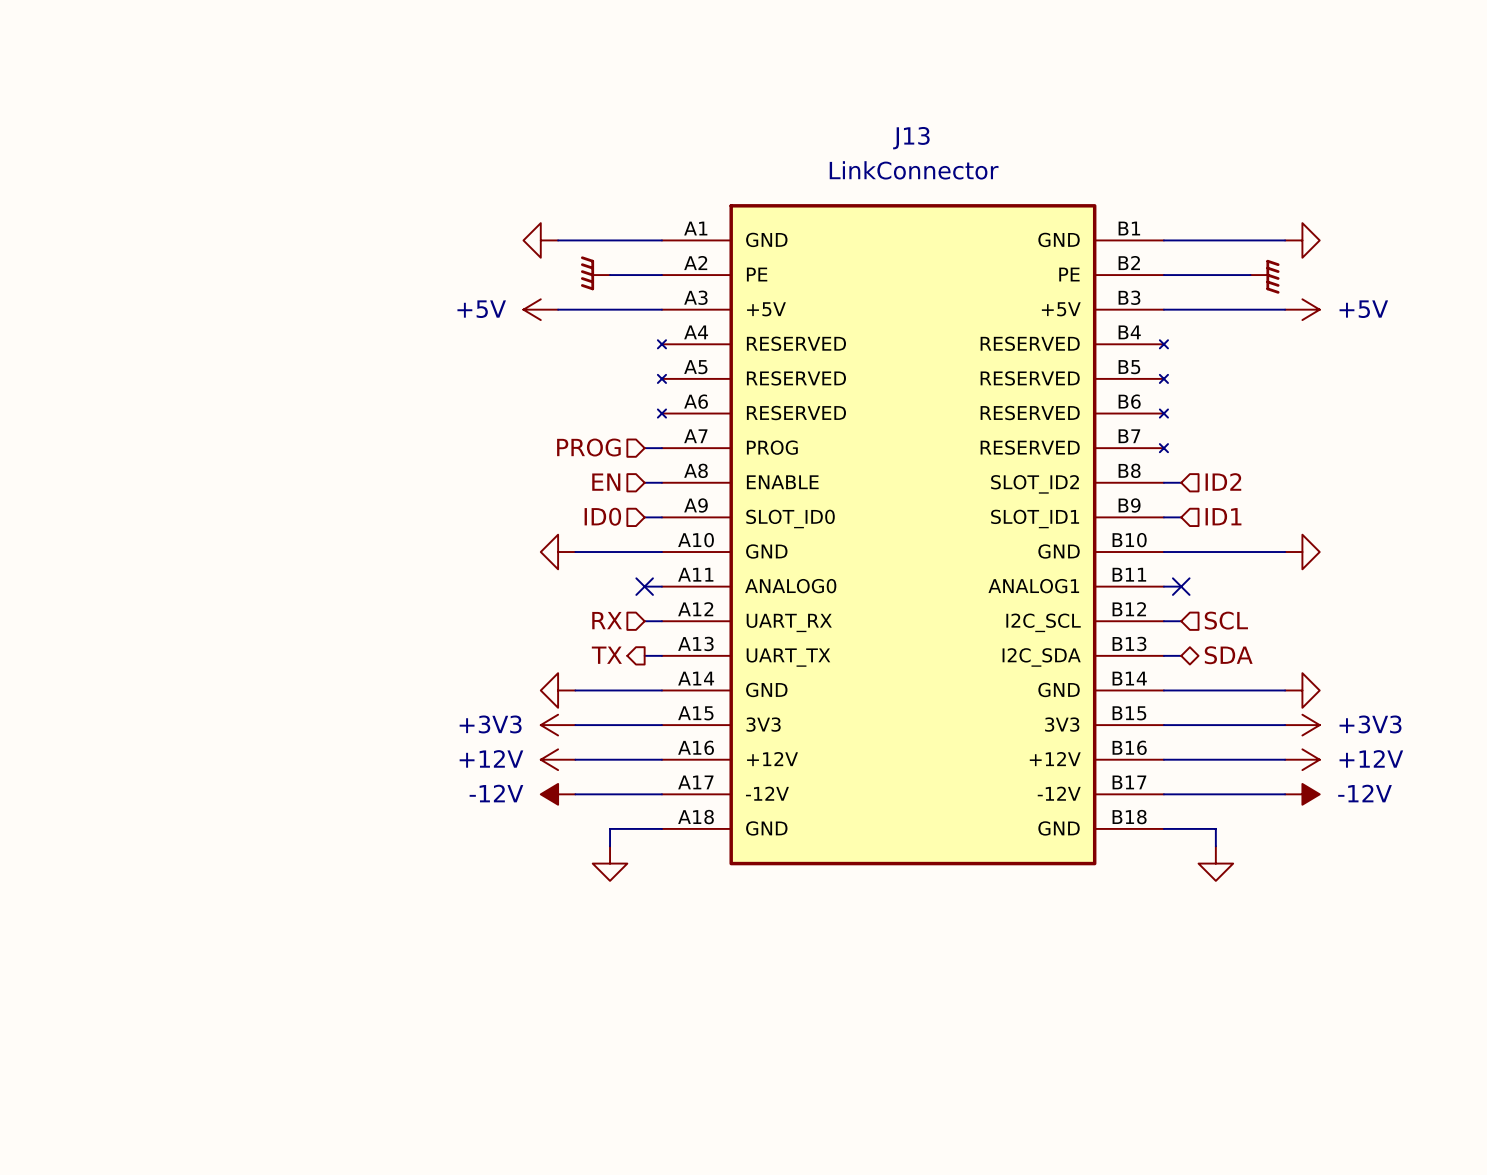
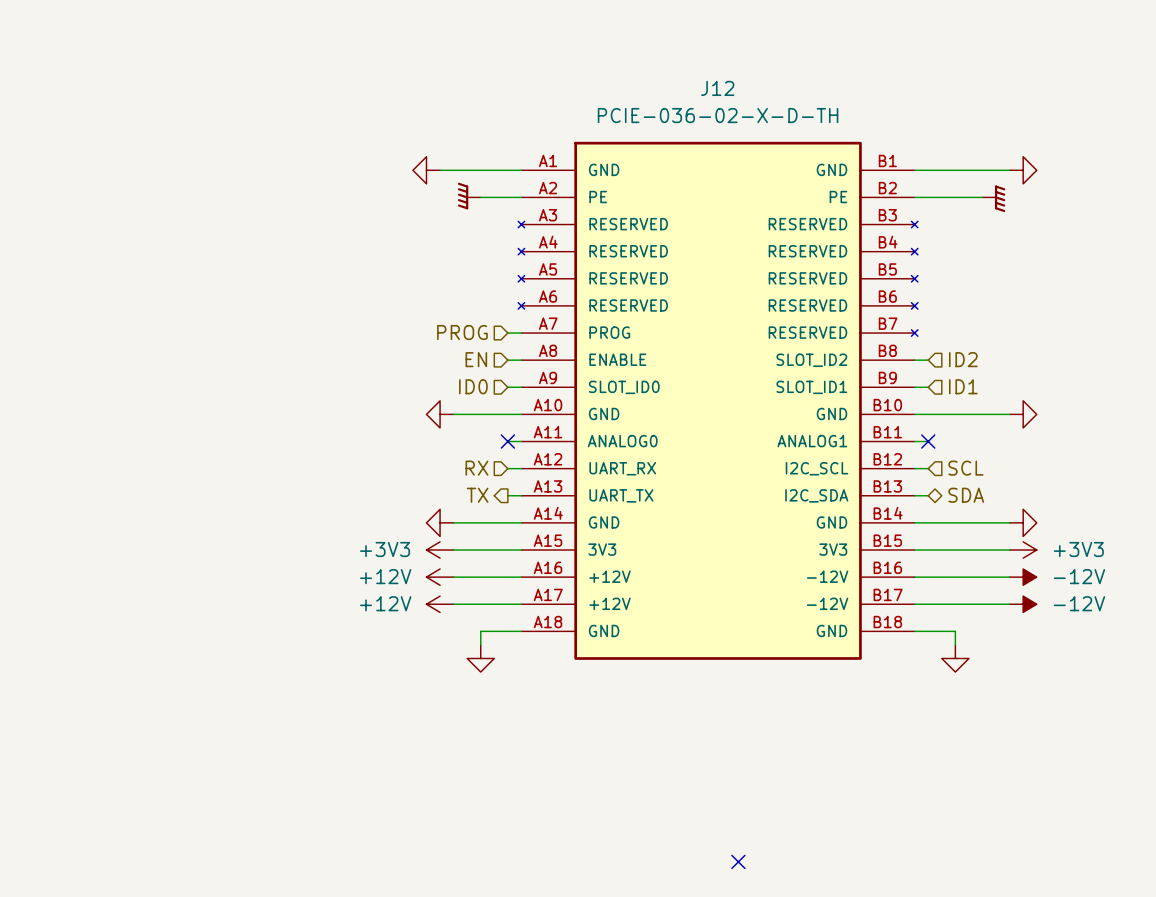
power symbol: +5V (540, 309) -> none
wire: (558, 309) (661, 309) -> none
wire: (1163, 309) (1285, 309) -> none
power symbol: +5V (1302, 309) -> none
J13: LinkConnector (912, 534) -> none
J12: none -> PCIE-036-02-X-D-TH (718, 400)
power symbol: +12V (1302, 759) -> -12V (1023, 577)
power symbol: -12V (558, 794) -> +12V (440, 604)
no-connect mark: none -> (738, 861)

